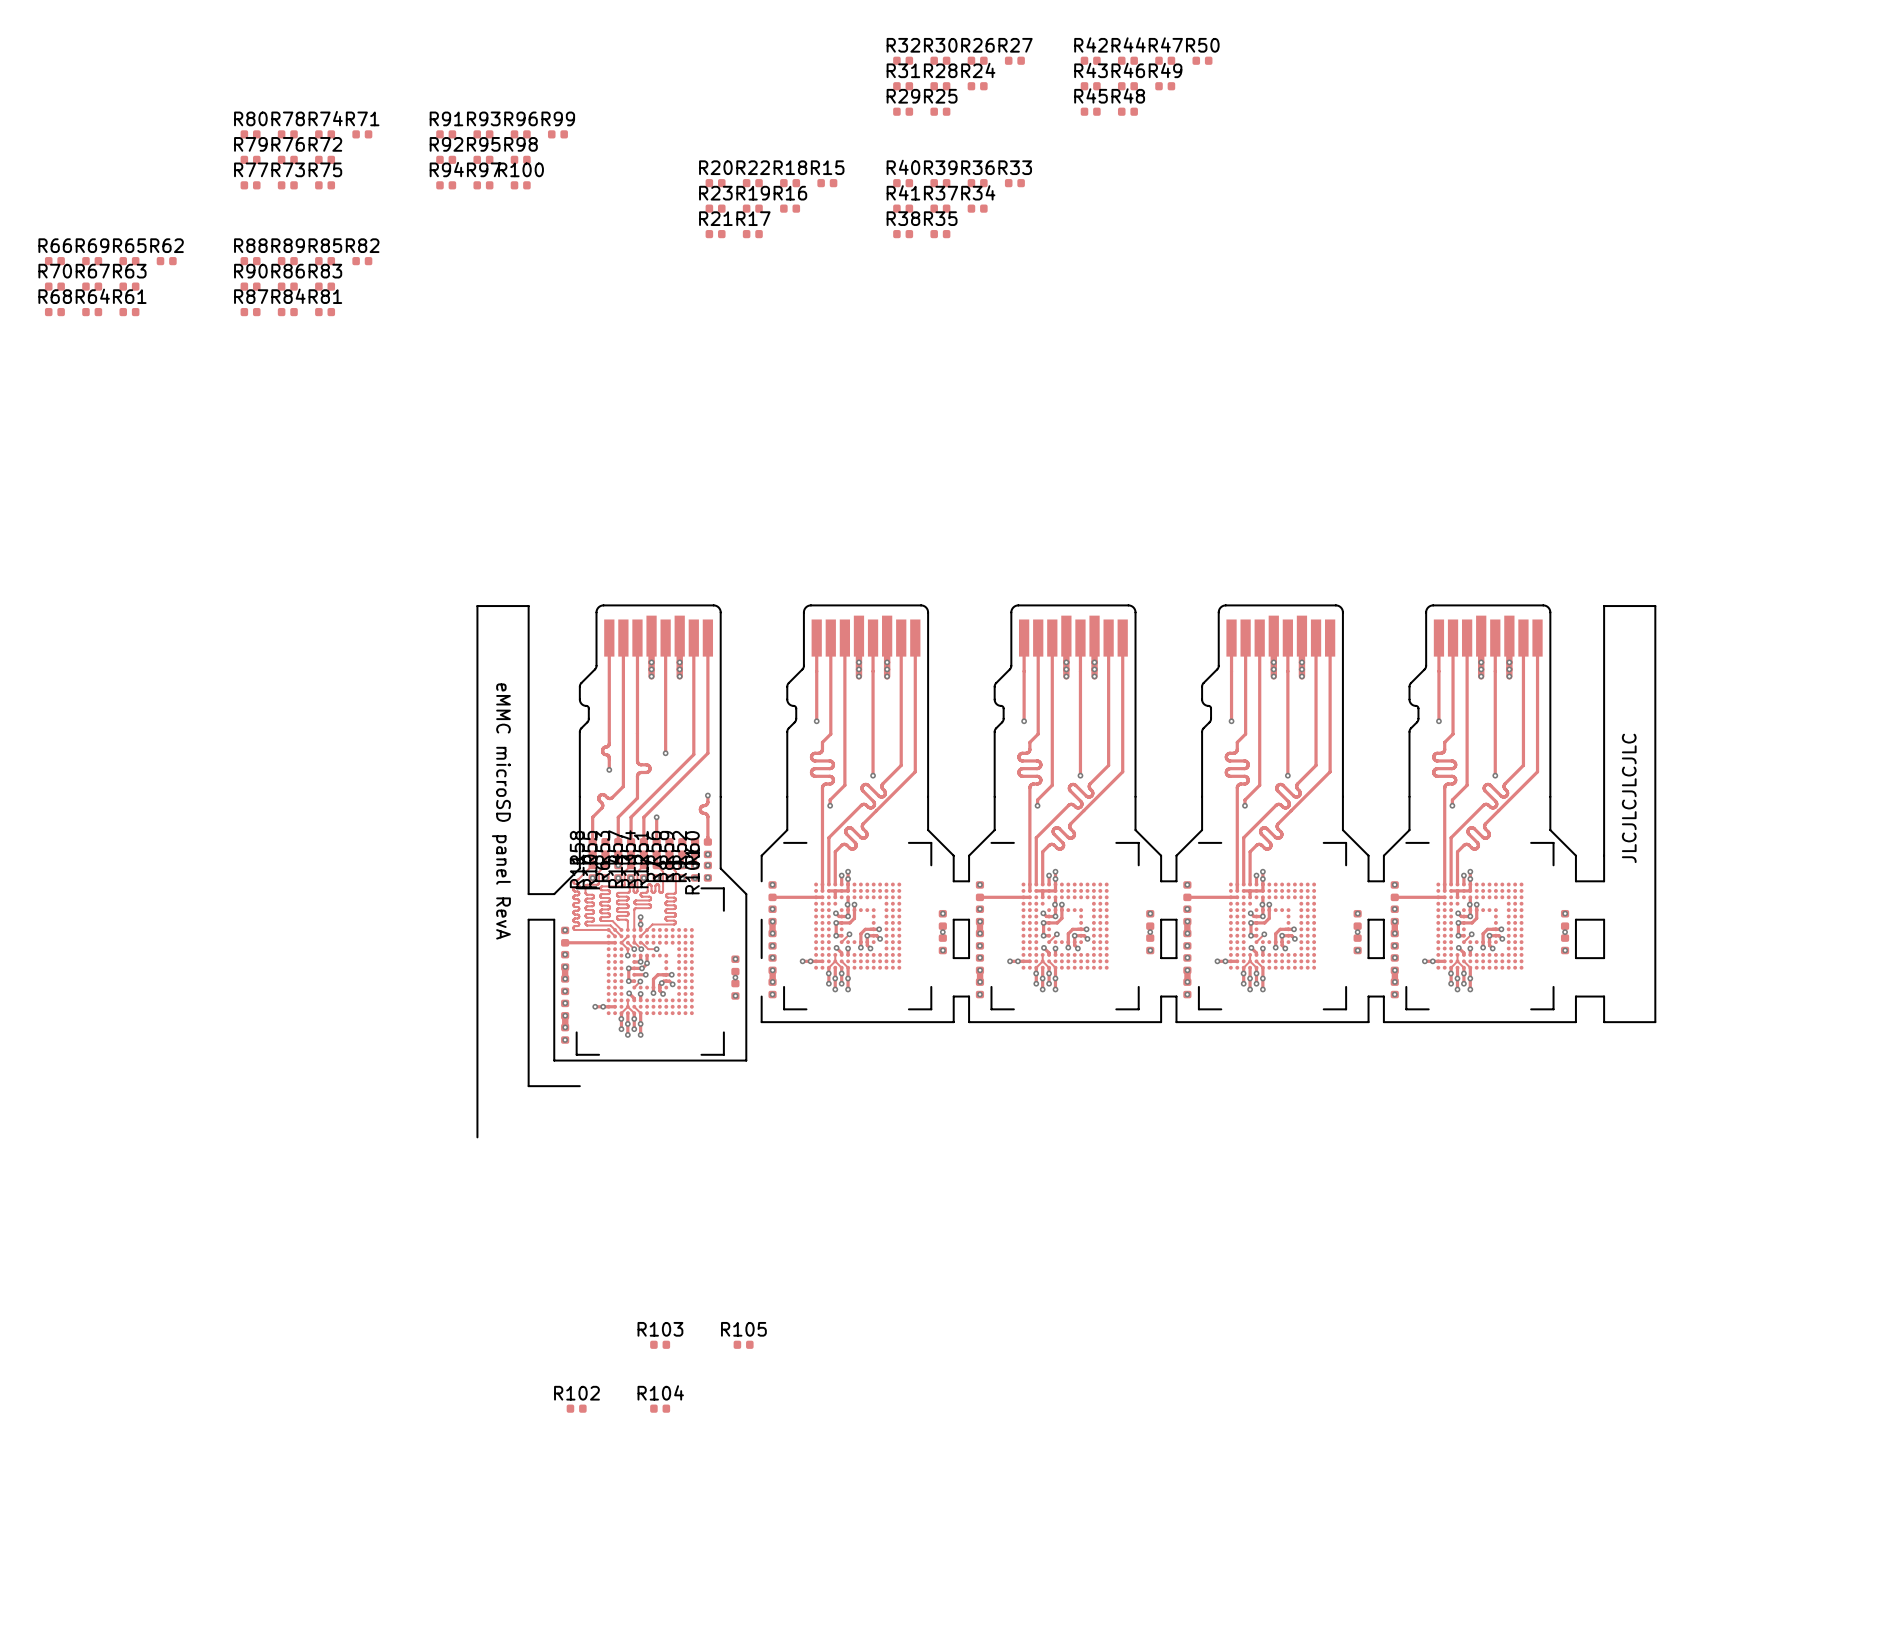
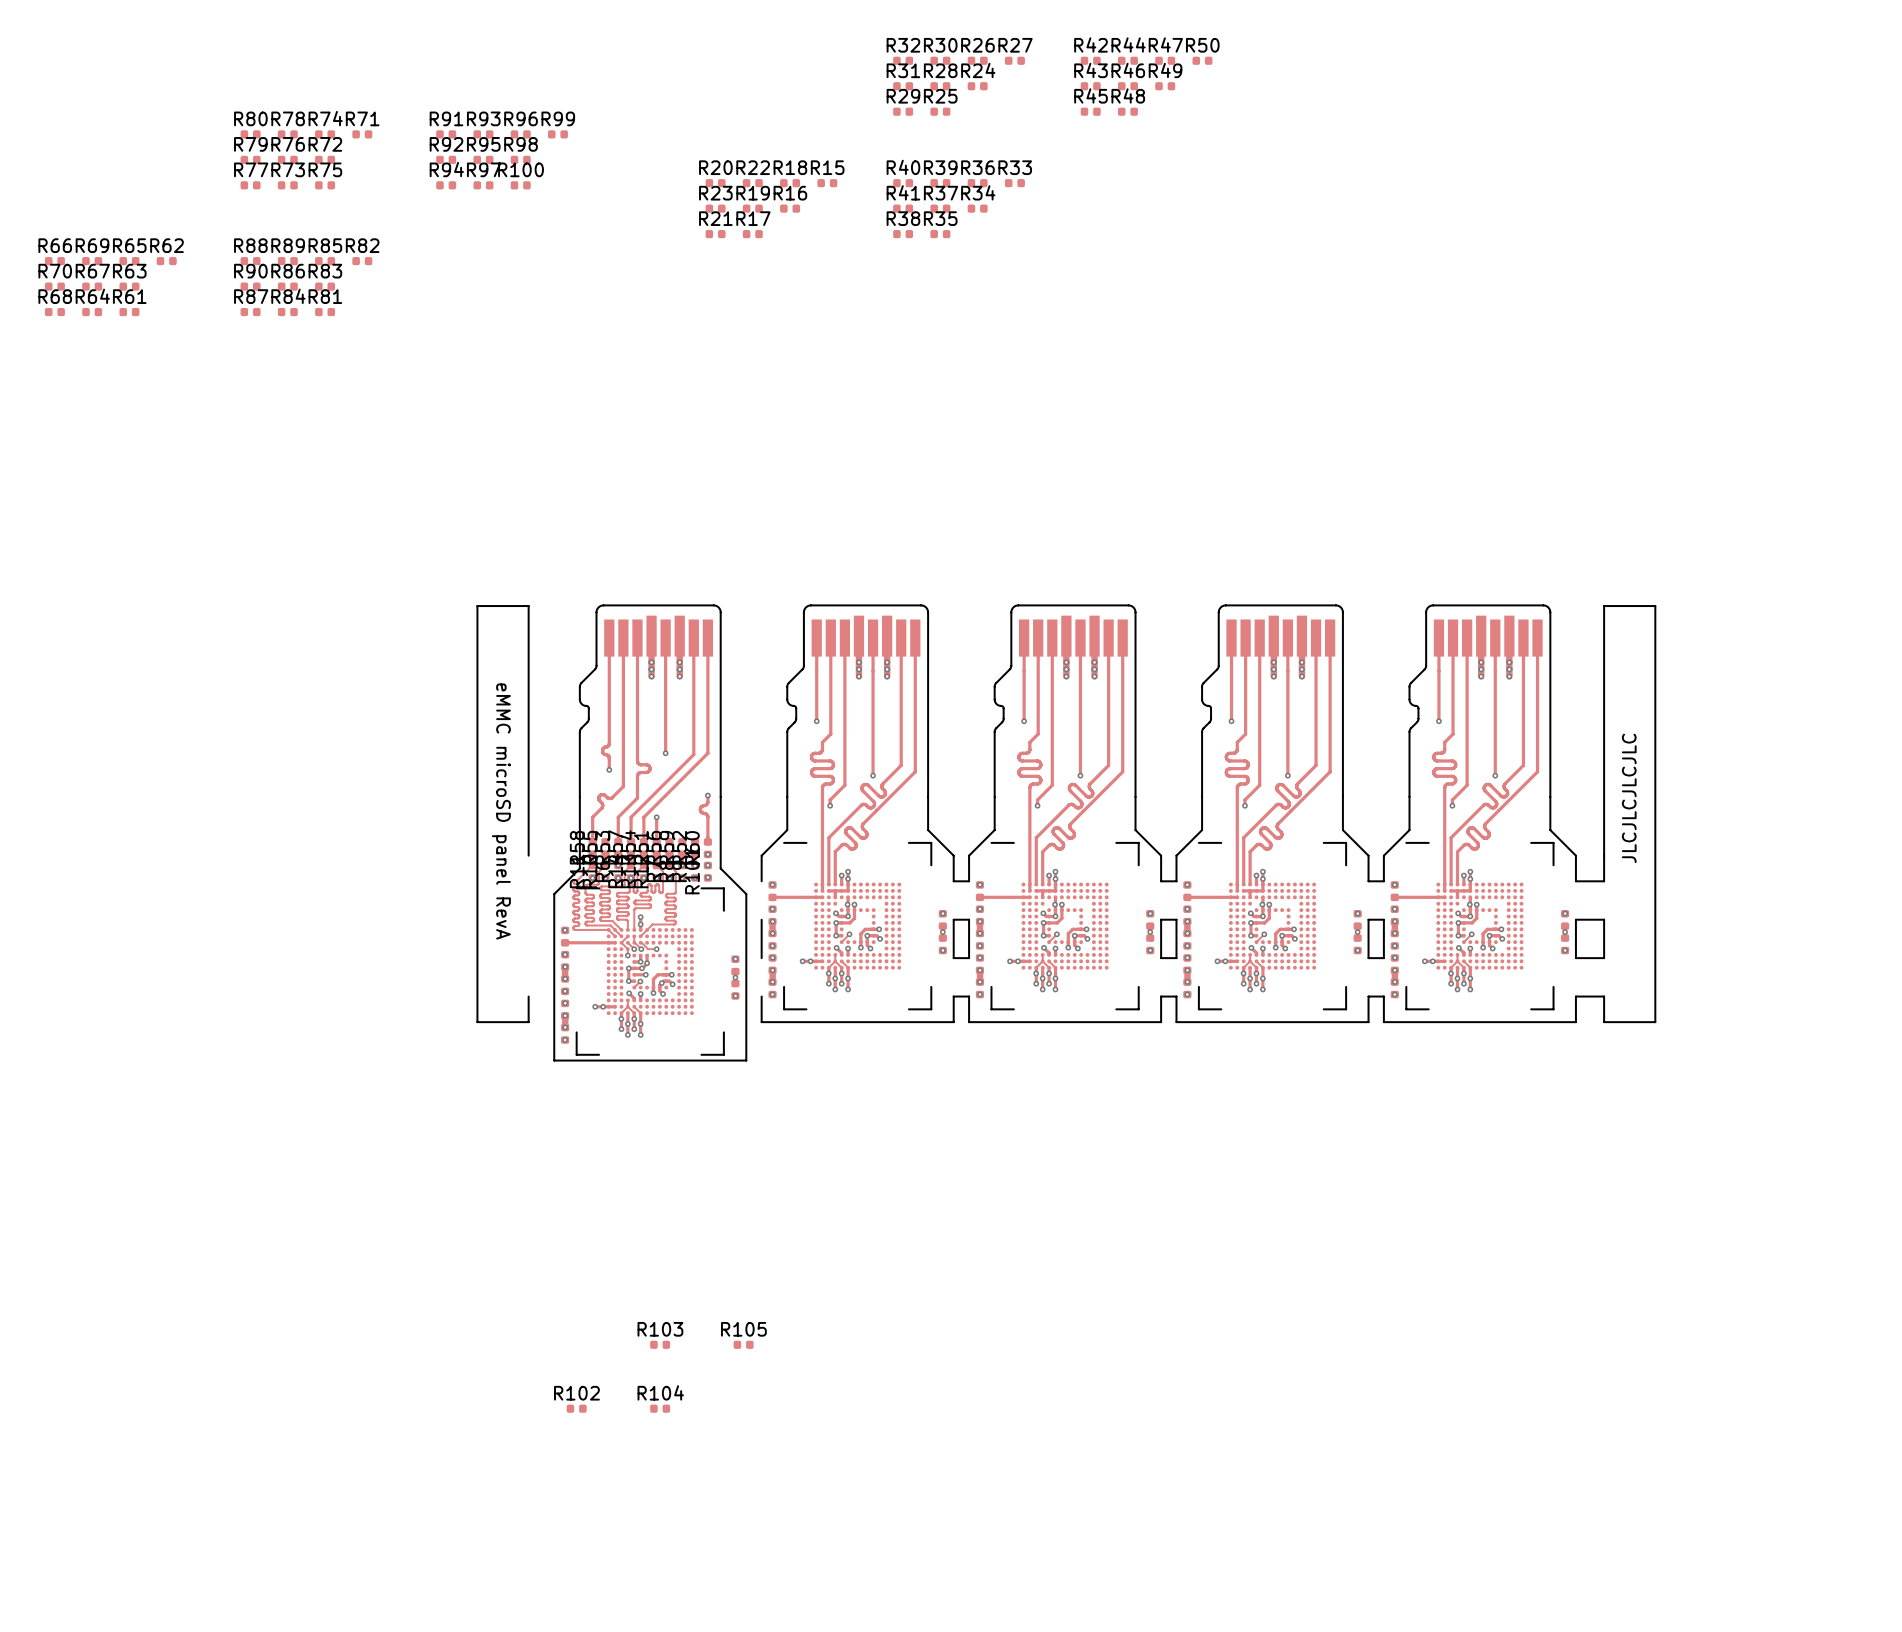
board edge: (528, 855) (528, 894) (554, 894) -> (554, 919) (554, 894)
board edge: (554, 919) (528, 919) (528, 996) -> none
board edge: (477, 1022) (477, 1137) -> none
board edge: (528, 1022) (528, 1086) (579, 1086) -> (528, 1022) (477, 1022)

